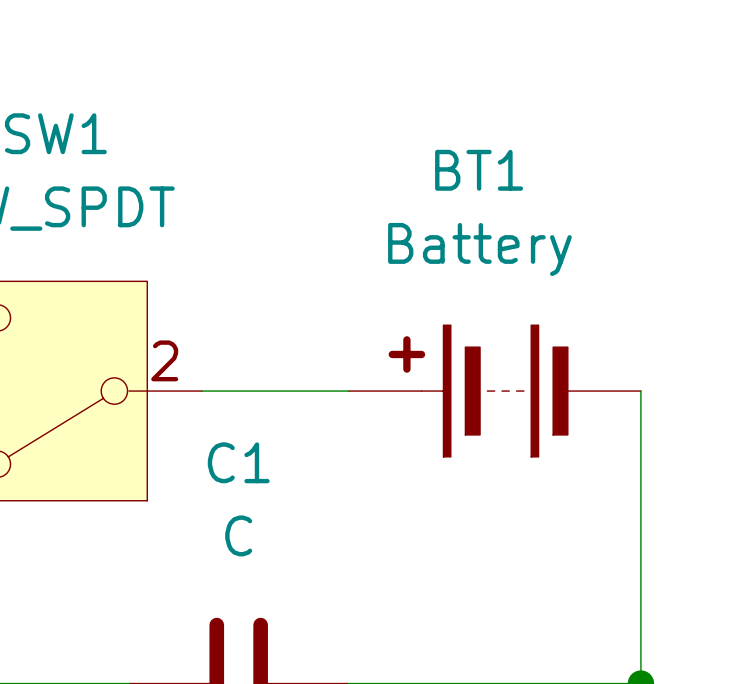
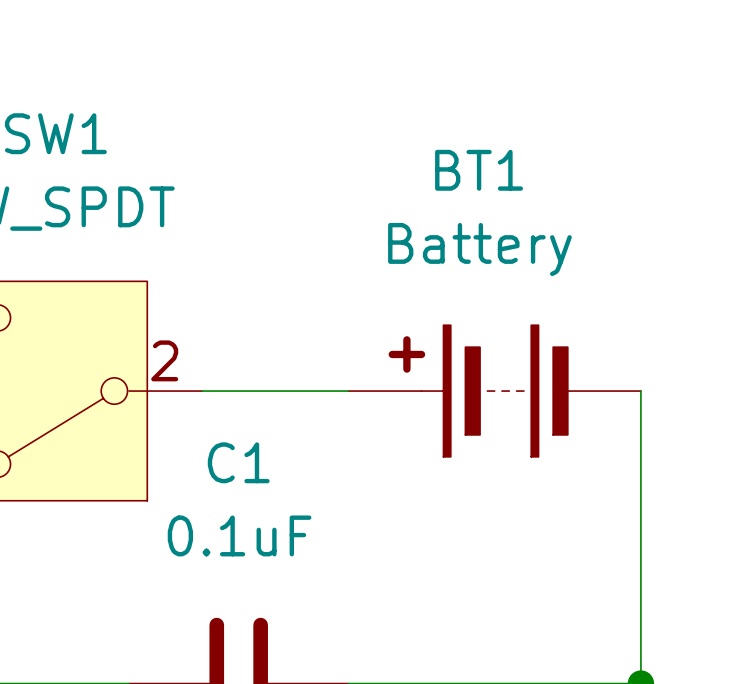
C1 value: C (238, 535) -> 0.1uF (239, 535)

